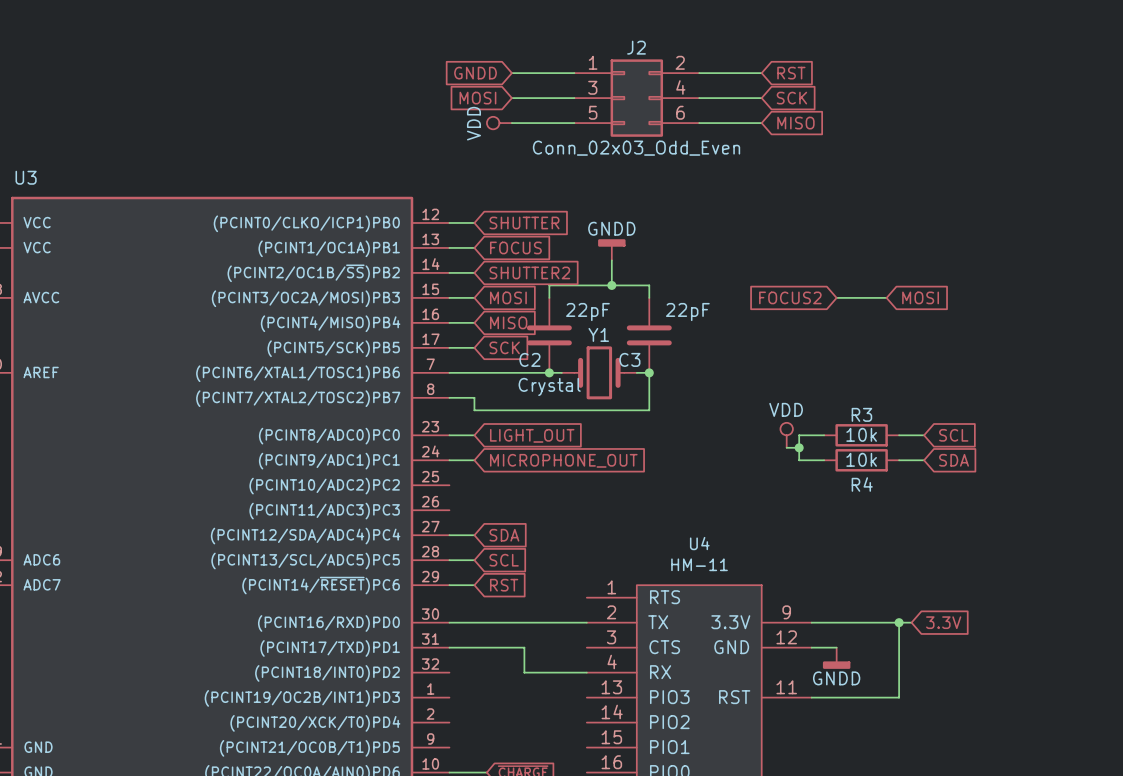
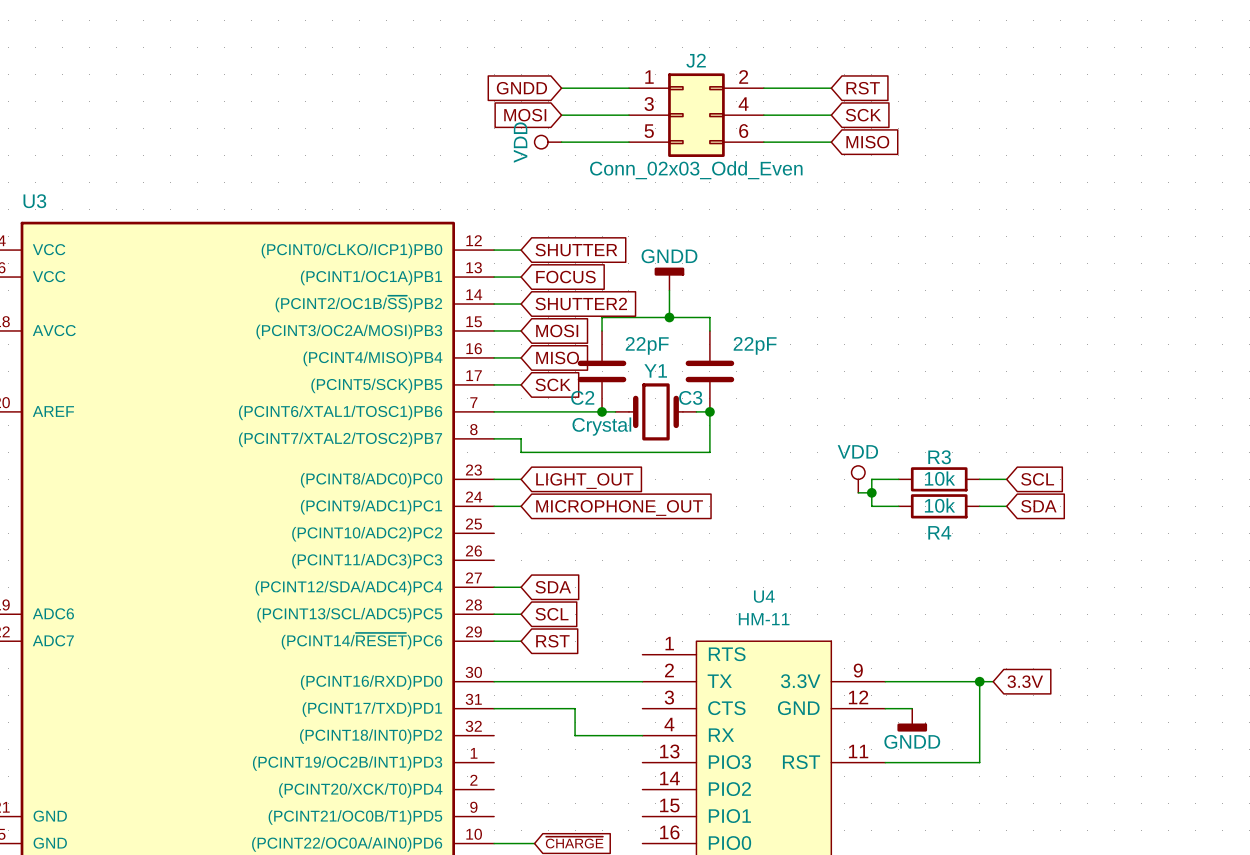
global label: FOCUS2 (790, 297) -> none
wire: (836, 297) (886, 297) -> none
global label: MOSI (920, 297) -> none

